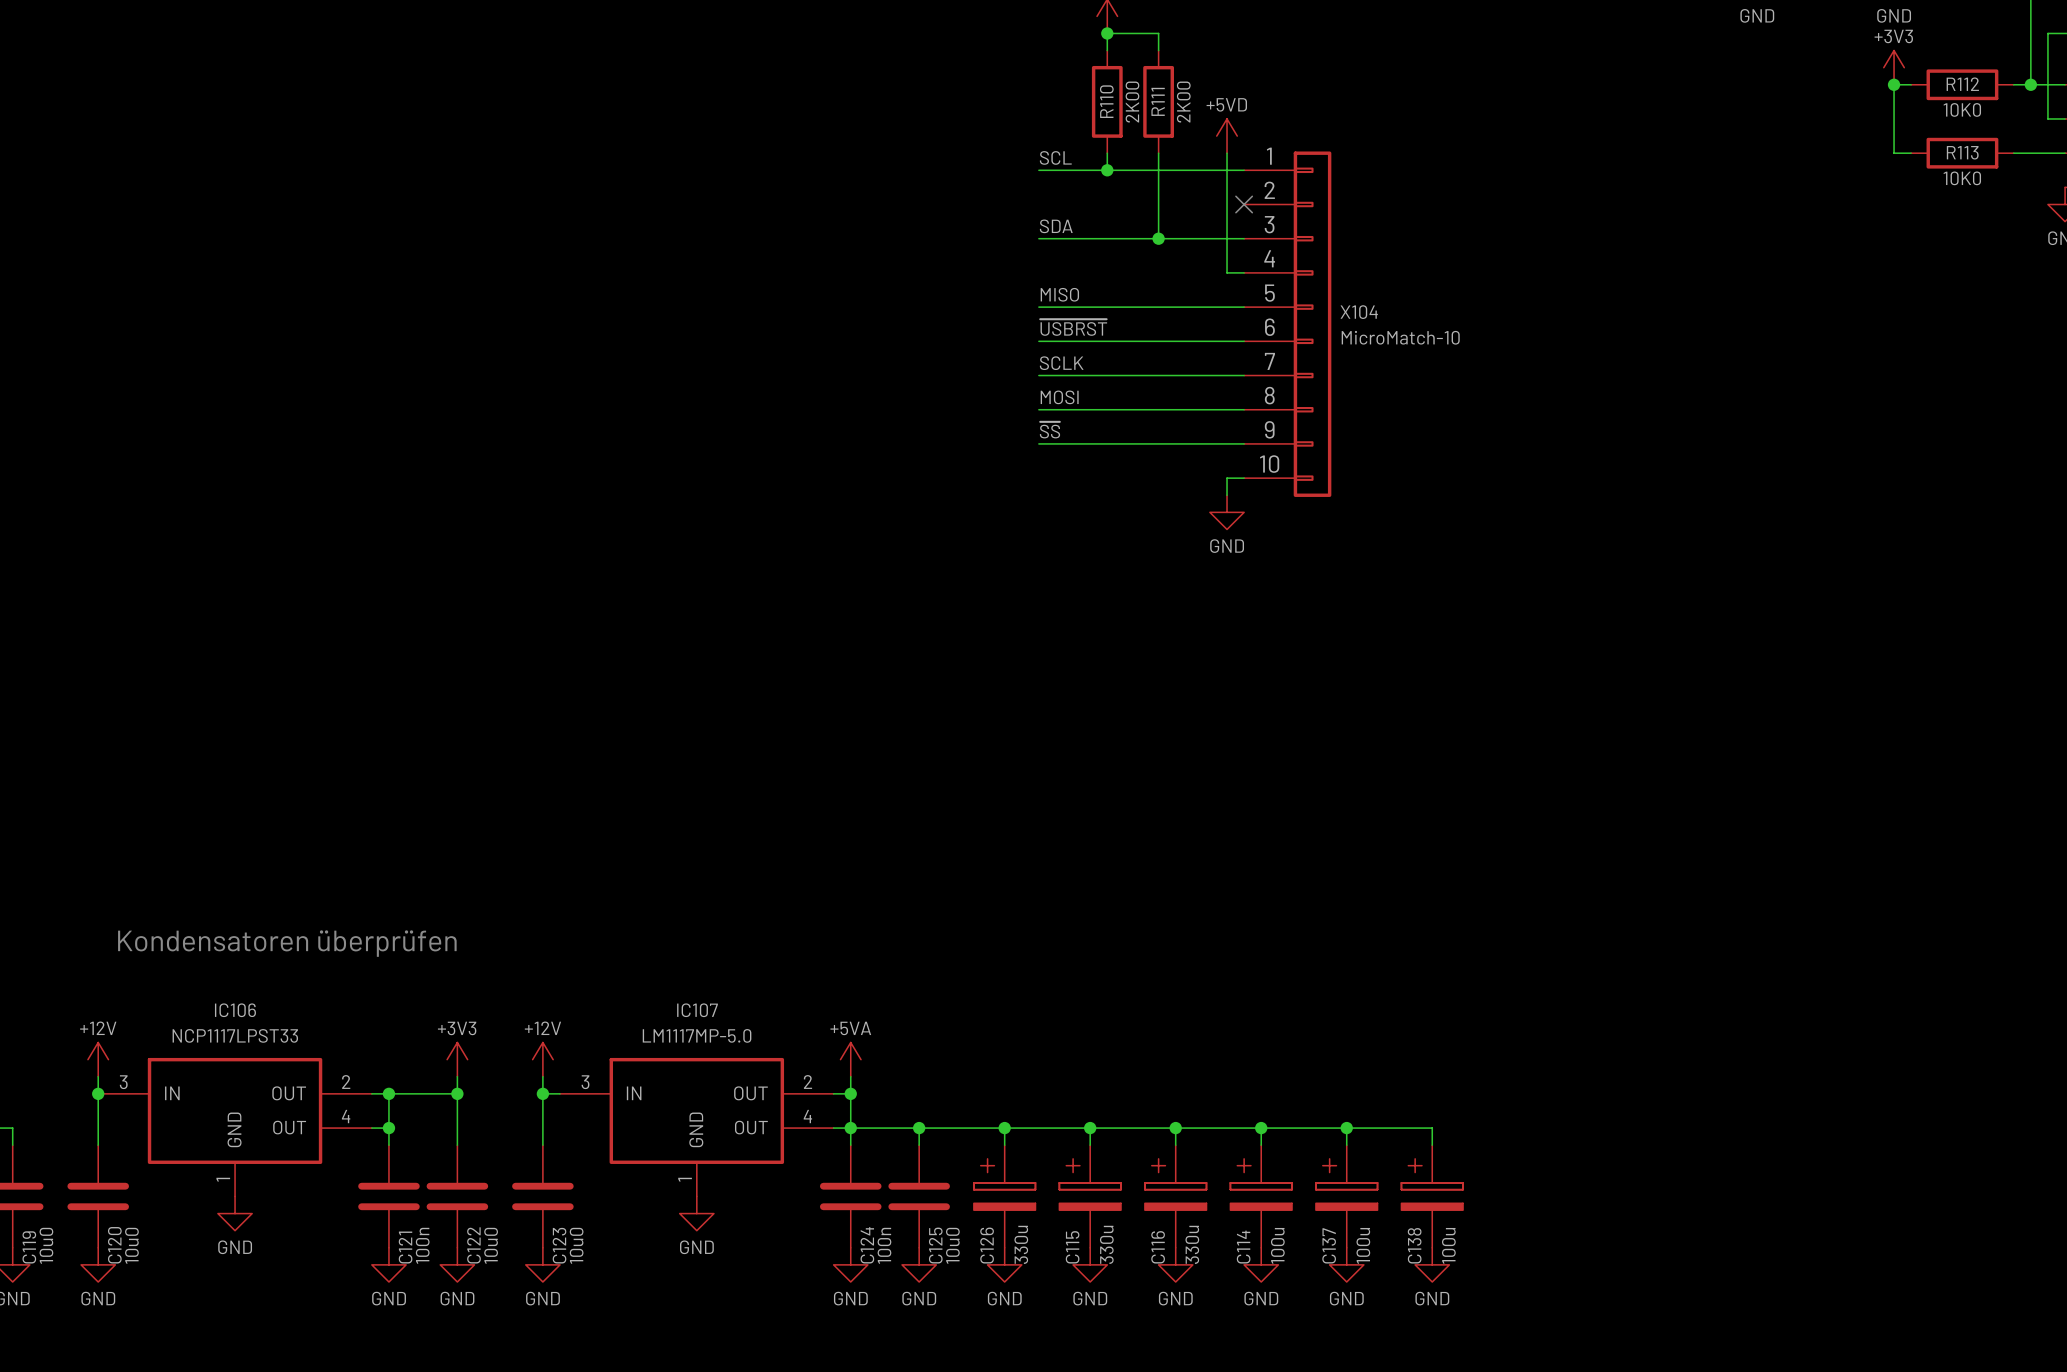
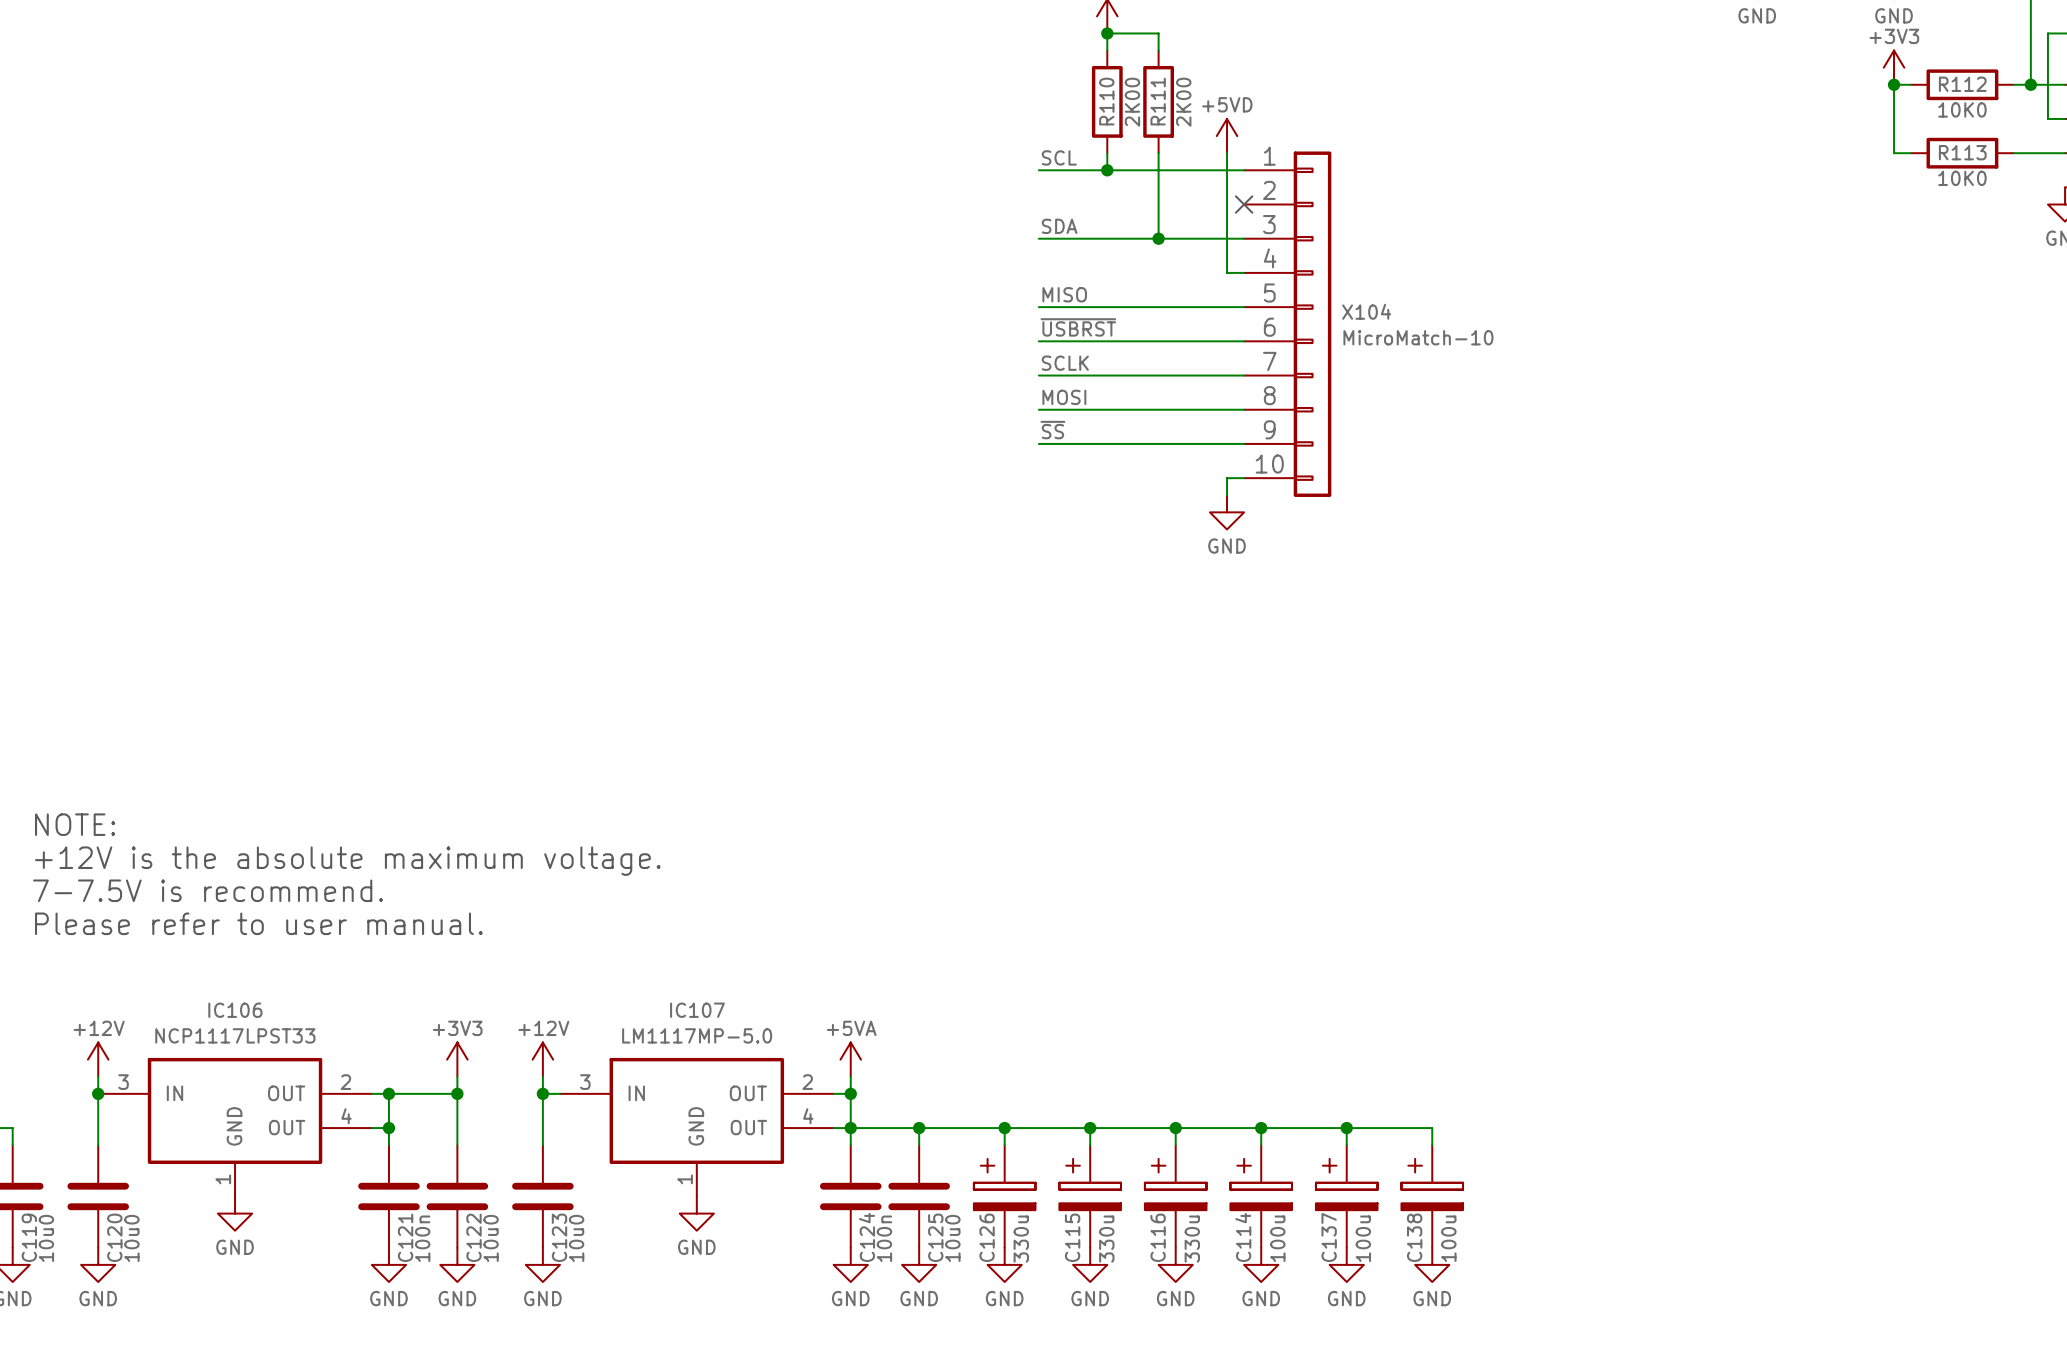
text: none -> NOTE: (75, 824)
text: none -> +12V is the absolute maximum voltage. (347, 861)
text: none -> 7-7.5V is recommend. (208, 890)
text: none -> Please refer to user manual. (258, 923)
text: Kondensatoren überprüfen (287, 943) -> none

